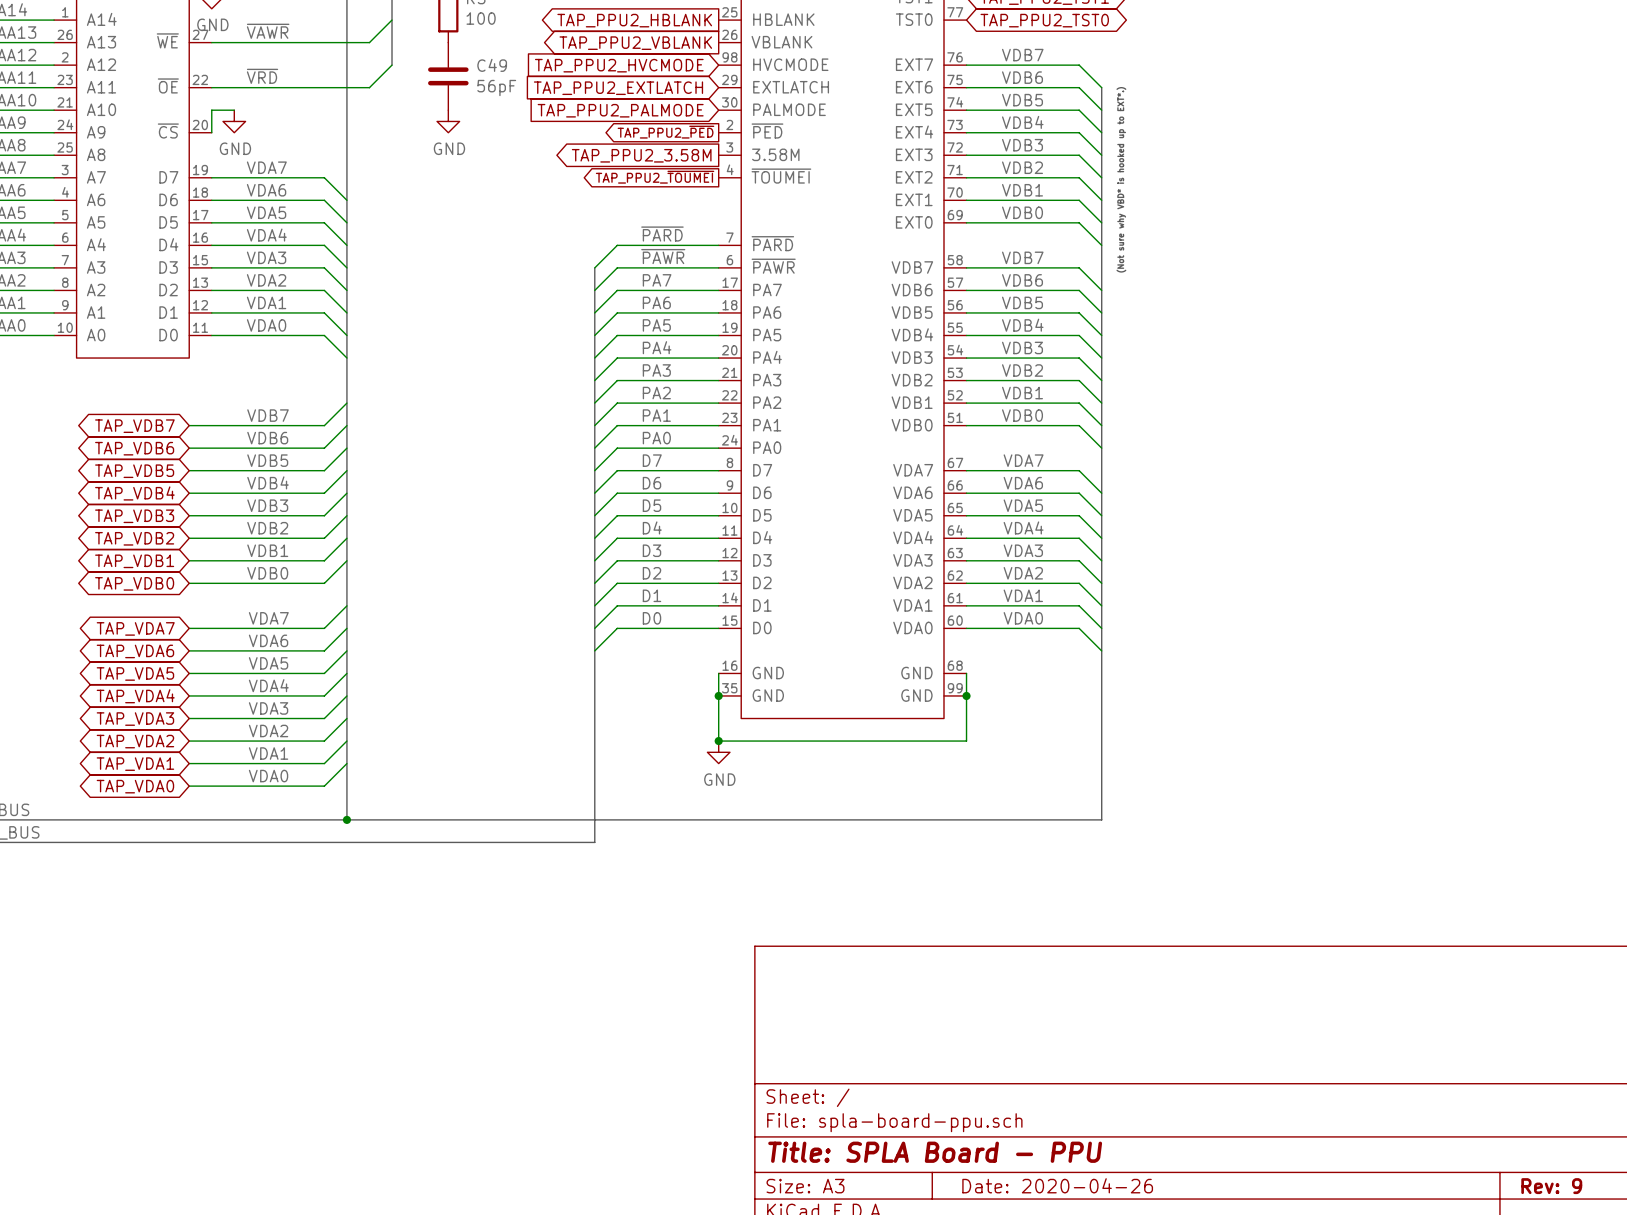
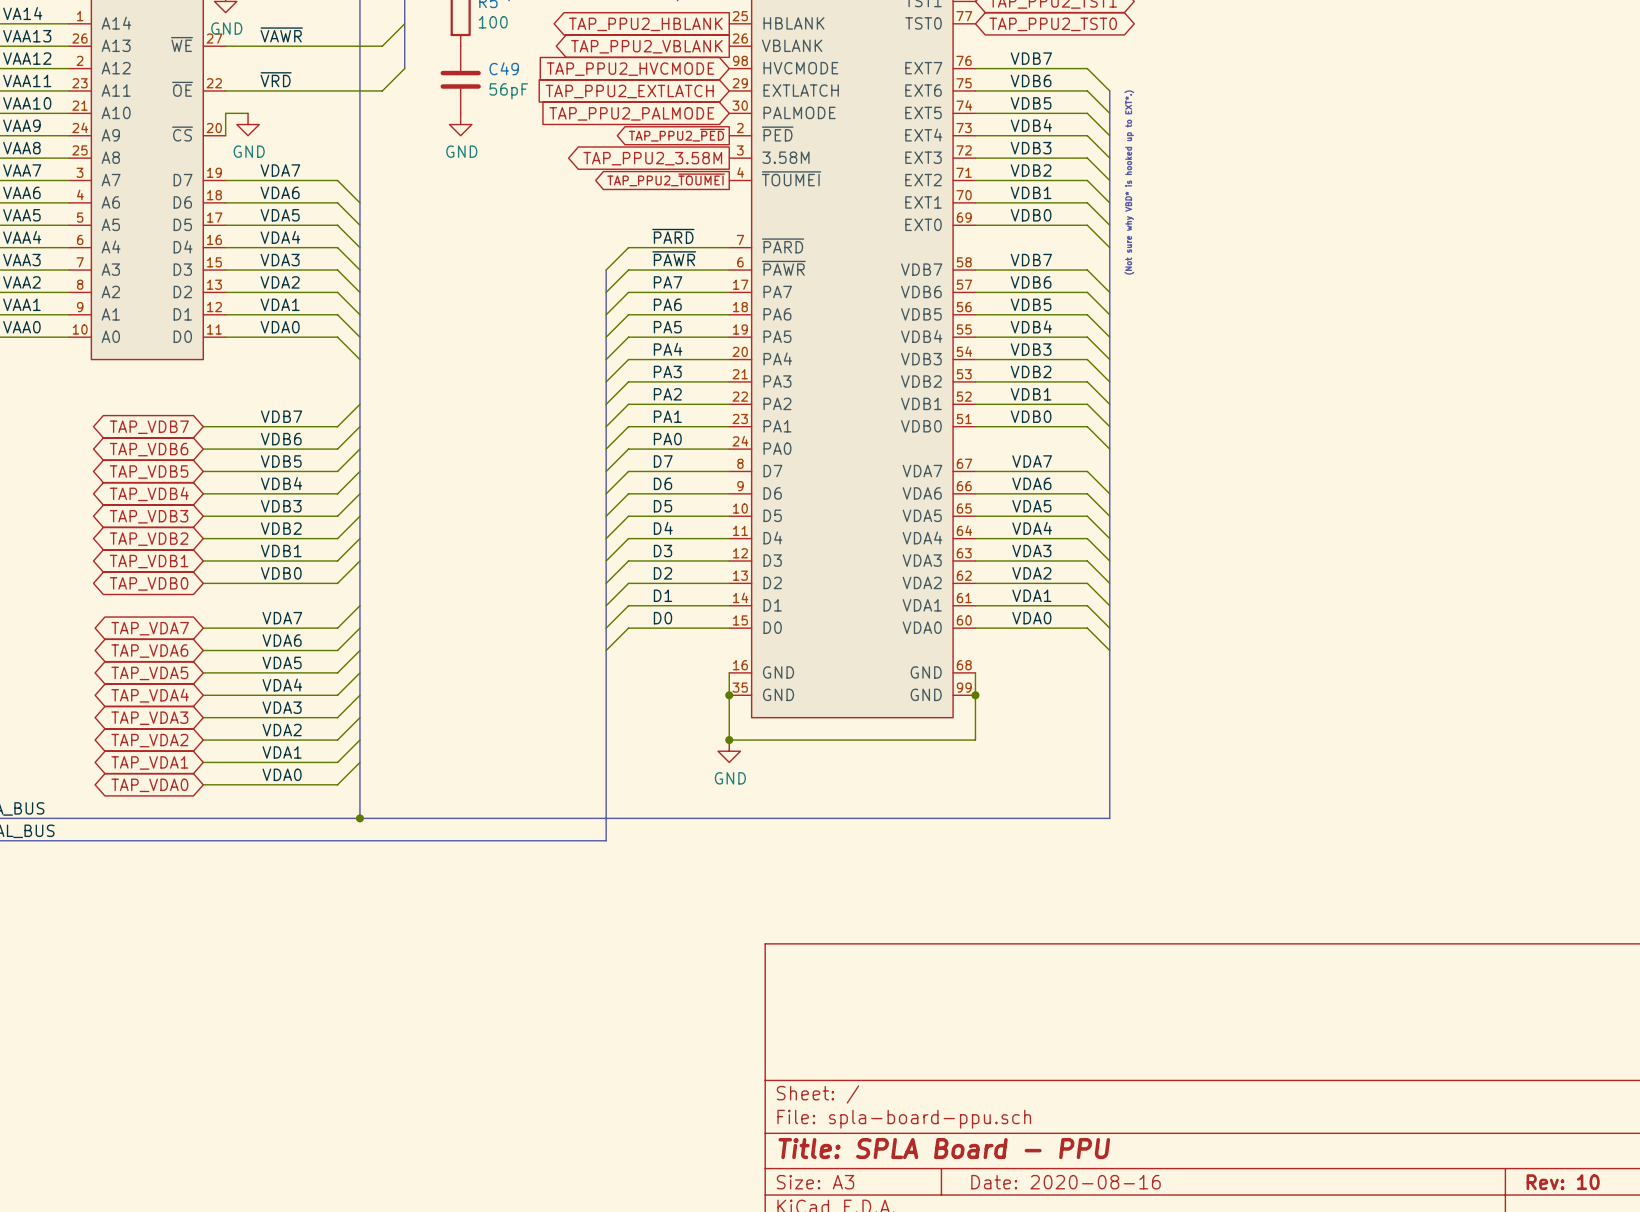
title block: Date: 2020-04-26 (1057, 1185) -> Date: 2020-08-16 (1066, 1182)
title block: Rev: 9 (1551, 1186) -> Rev: 10 (1563, 1182)

